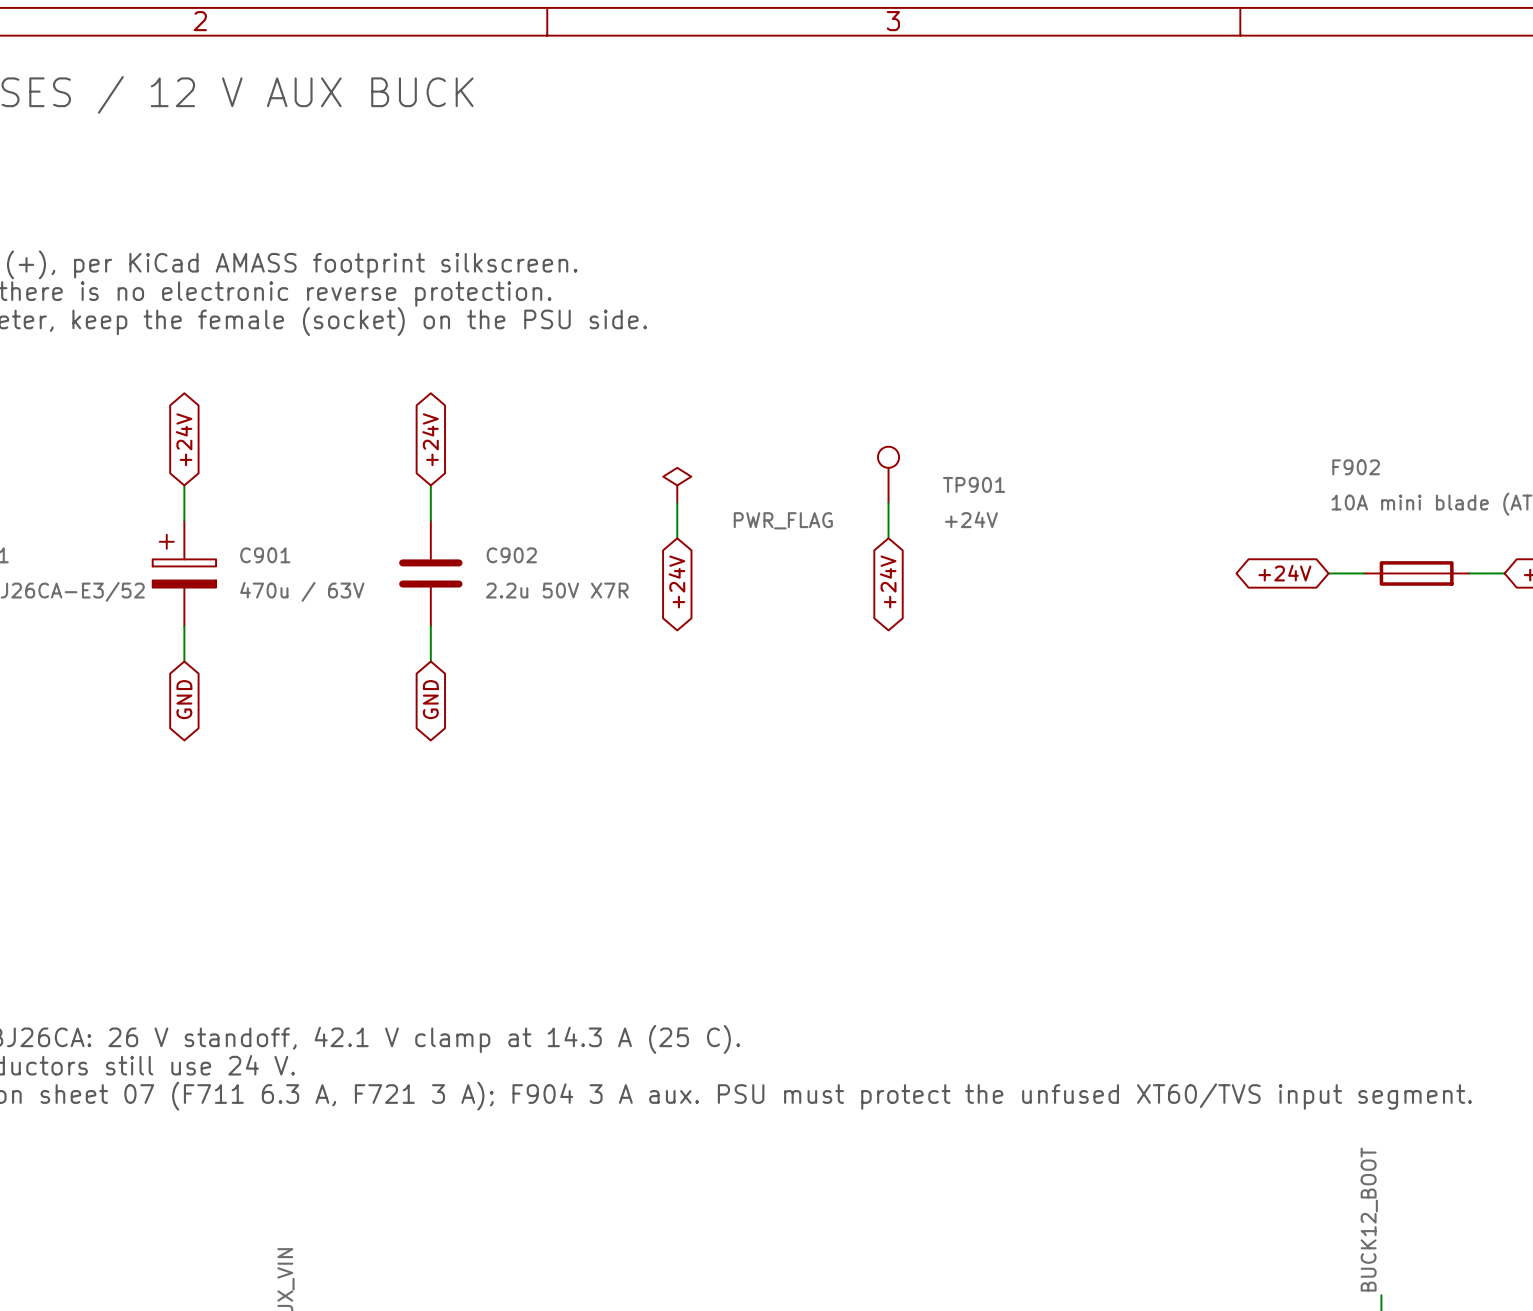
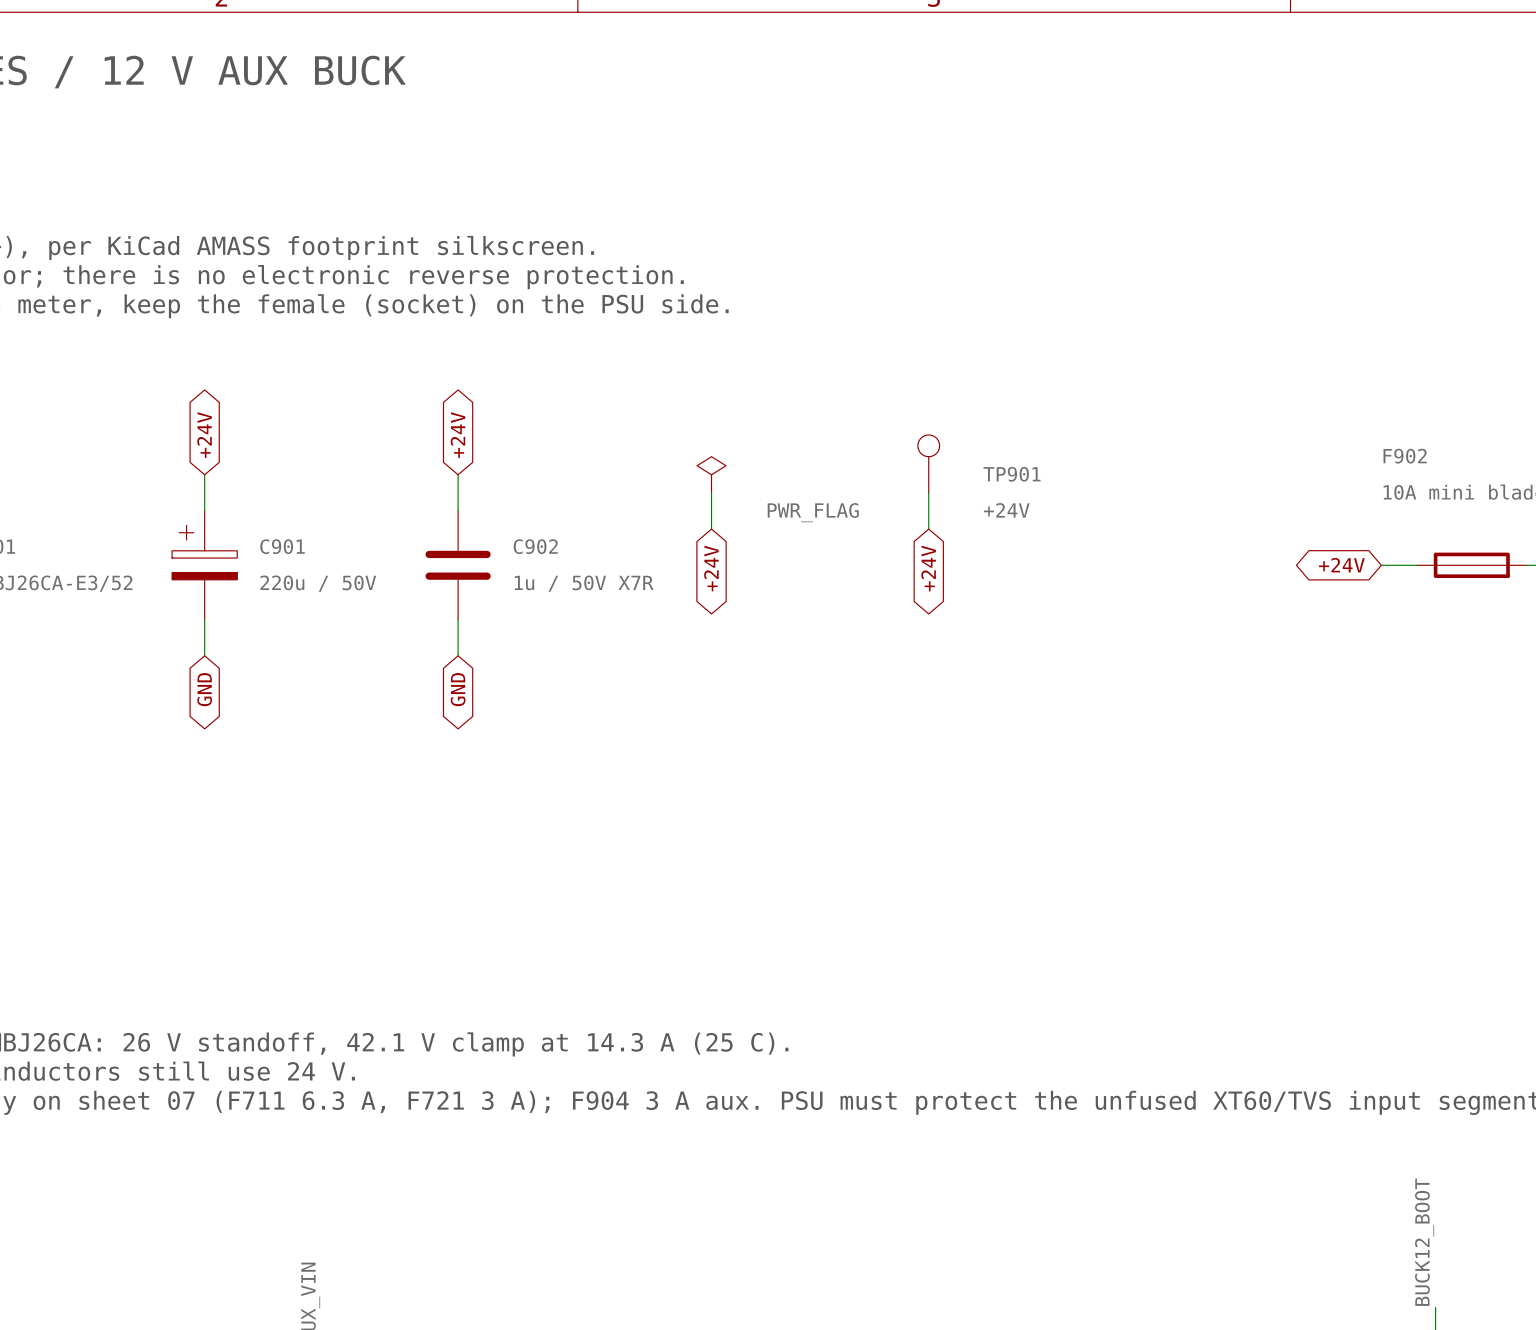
C902 value: 2.2u 50V X7R (557, 590) -> 1u / 50V X7R (584, 583)
C901 value: 470u / 63V (302, 591) -> 220u / 50V (318, 583)

